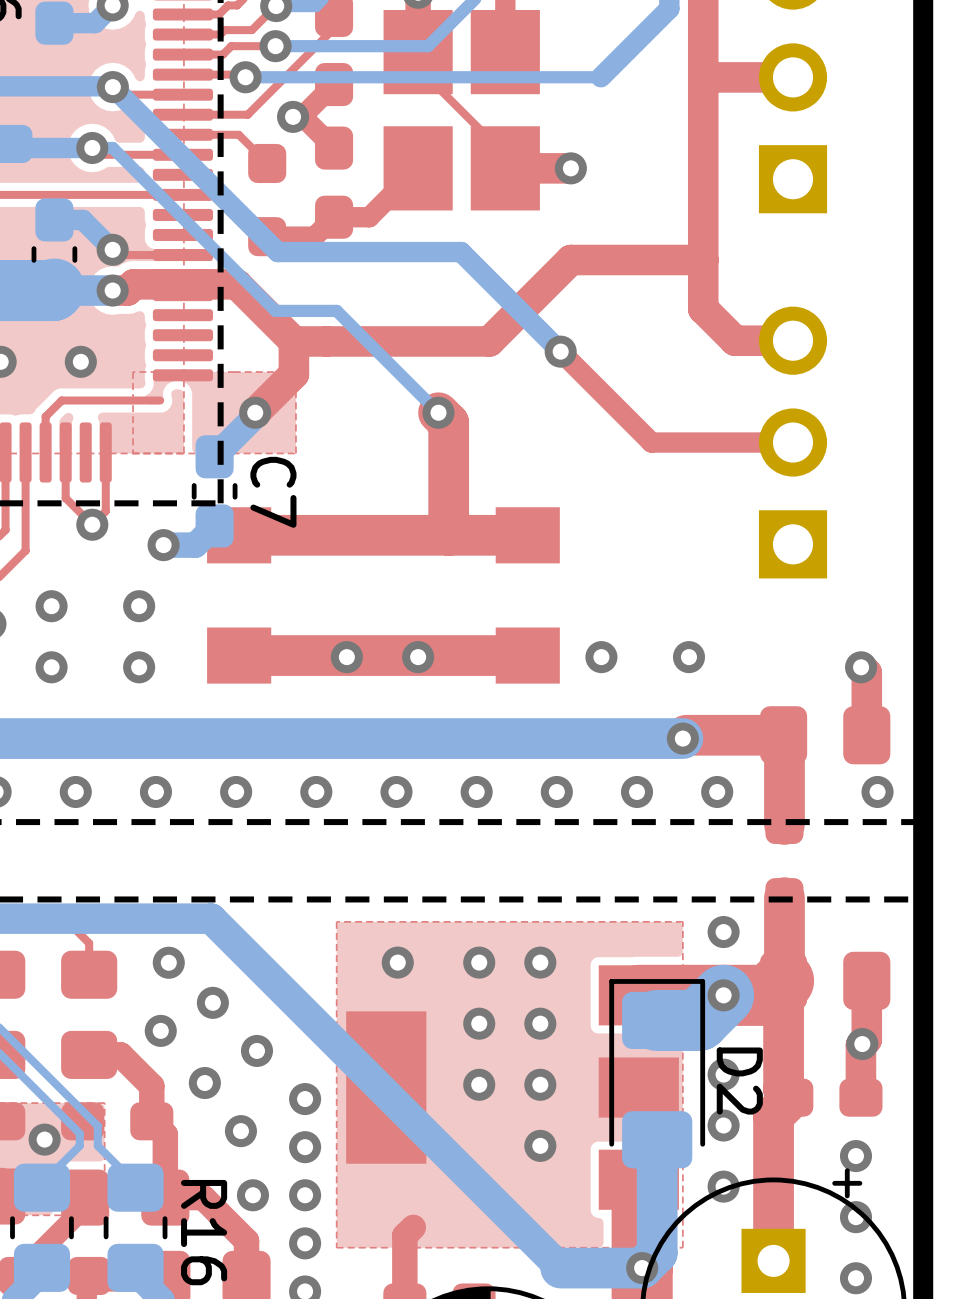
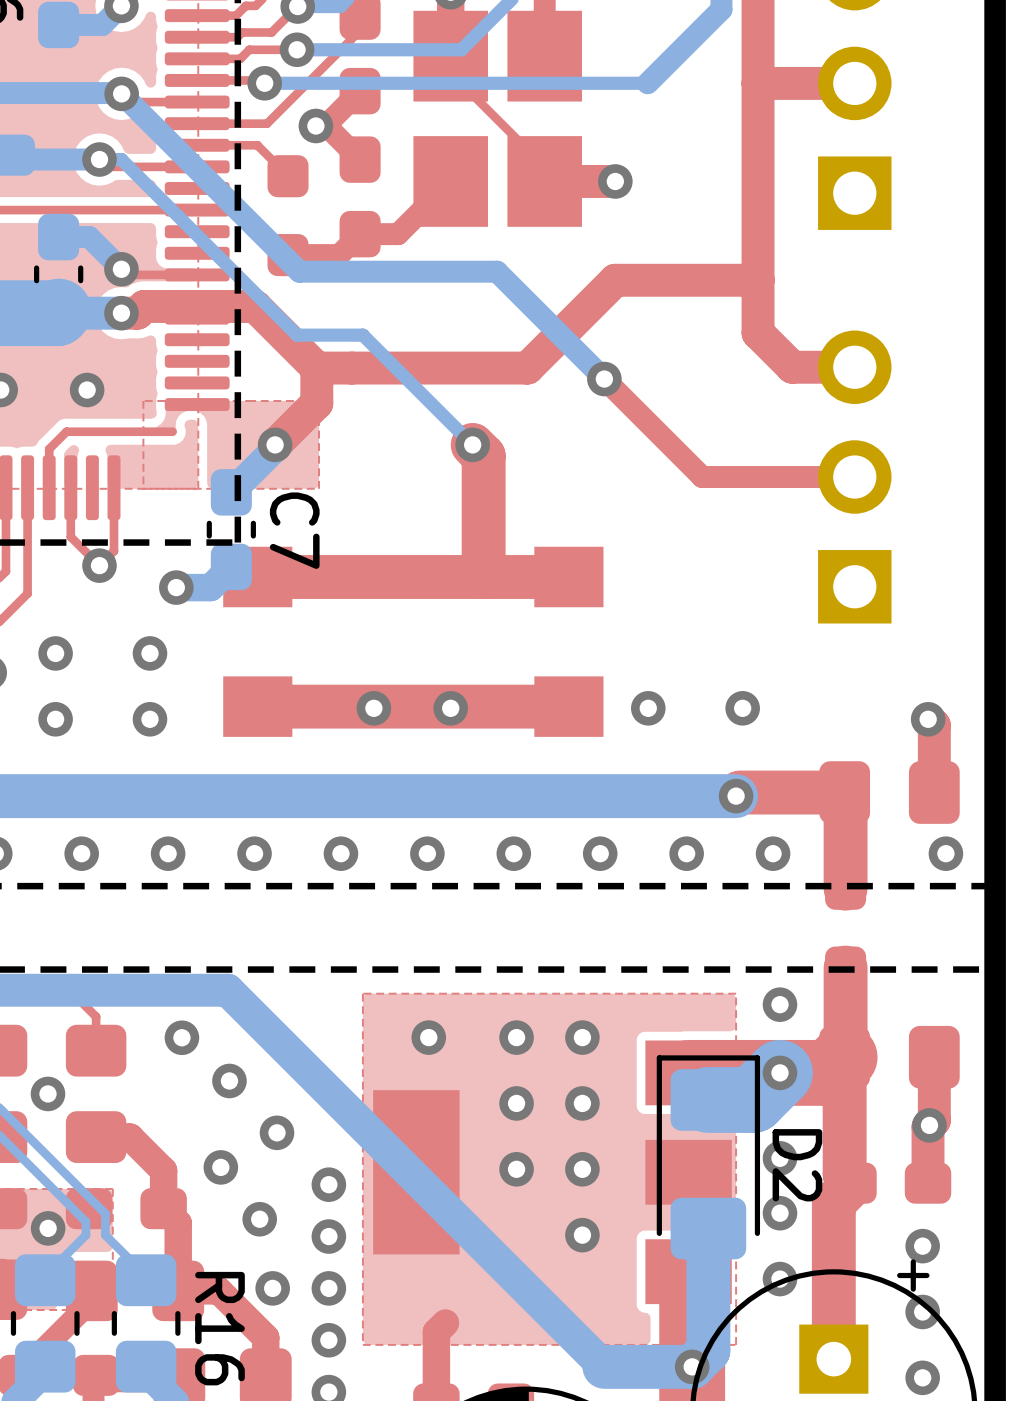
via position: (160, 1030) -> (47, 1093)

